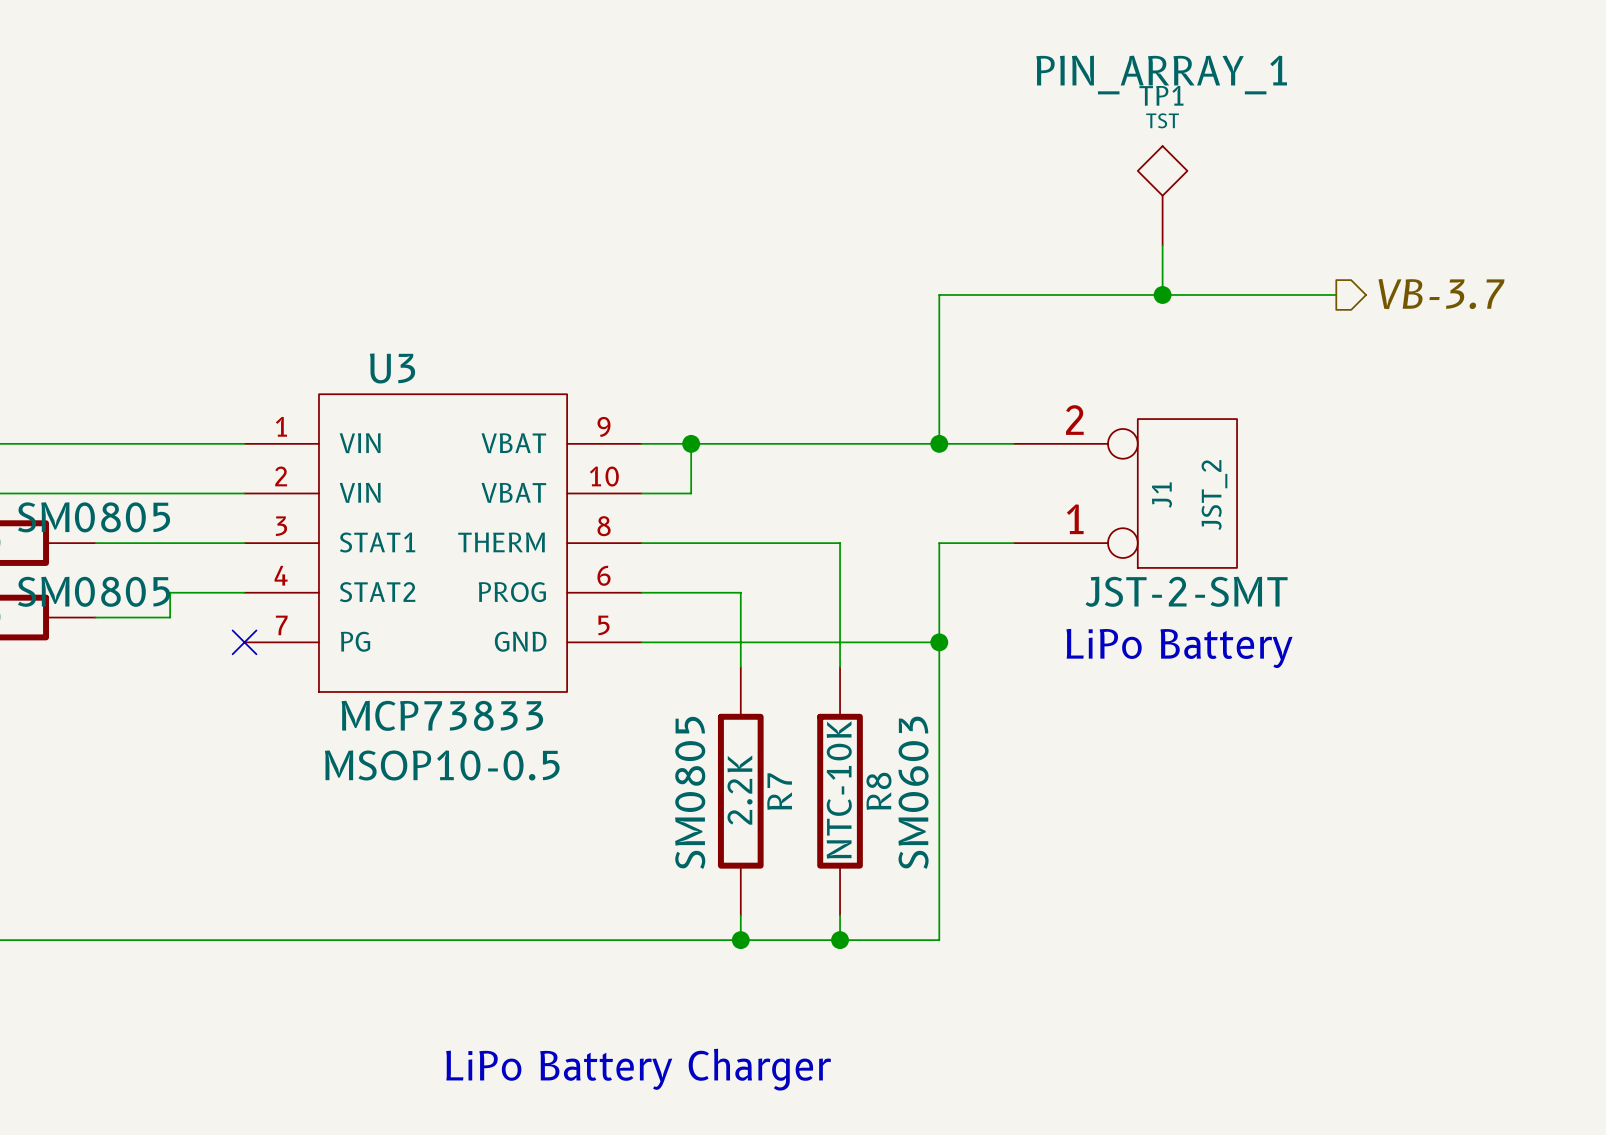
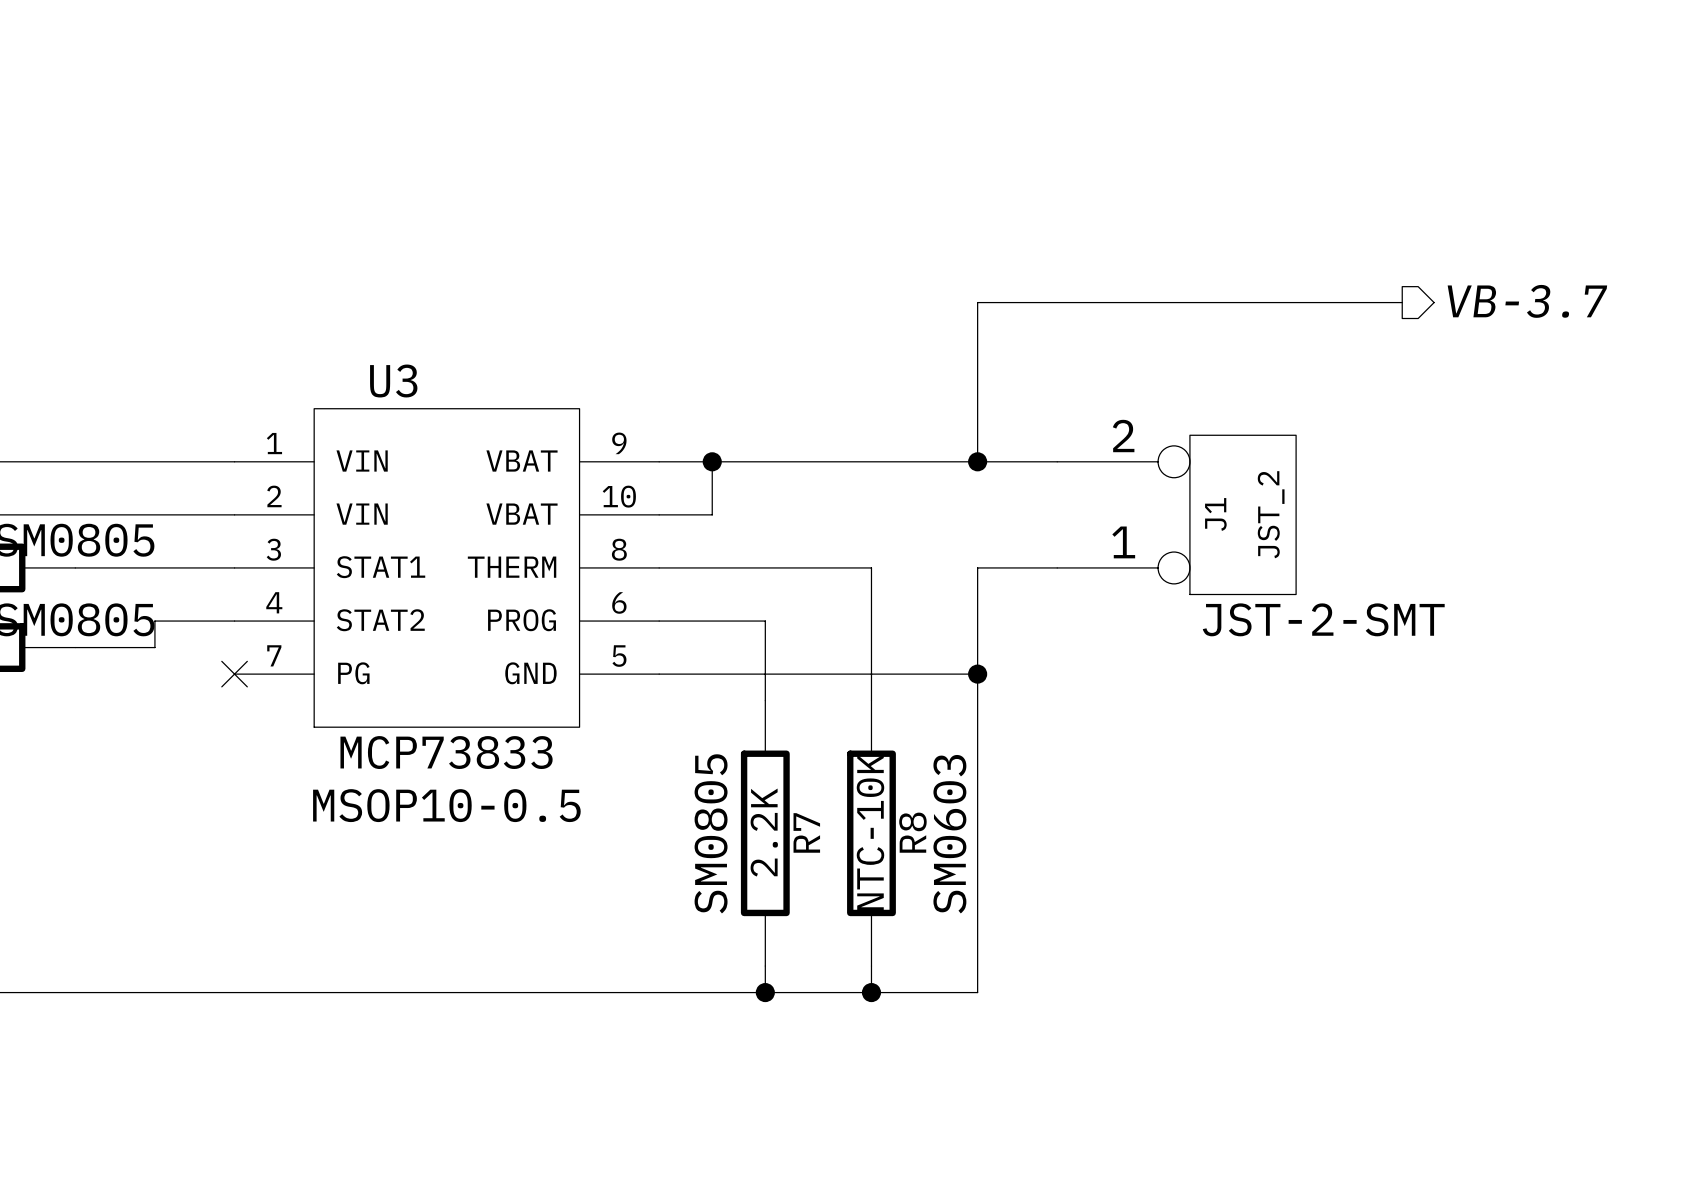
TP1: TST (1162, 195) -> none
wire: (1162, 245) (1162, 294) -> none
junction: (1162, 294) -> none
J1 text position: JST-2-SMT (1186, 591) -> JST-2-SMT (1323, 619)
text: LiPo Battery (1179, 648) -> none
text: LiPo Battery Charger (638, 1069) -> none

